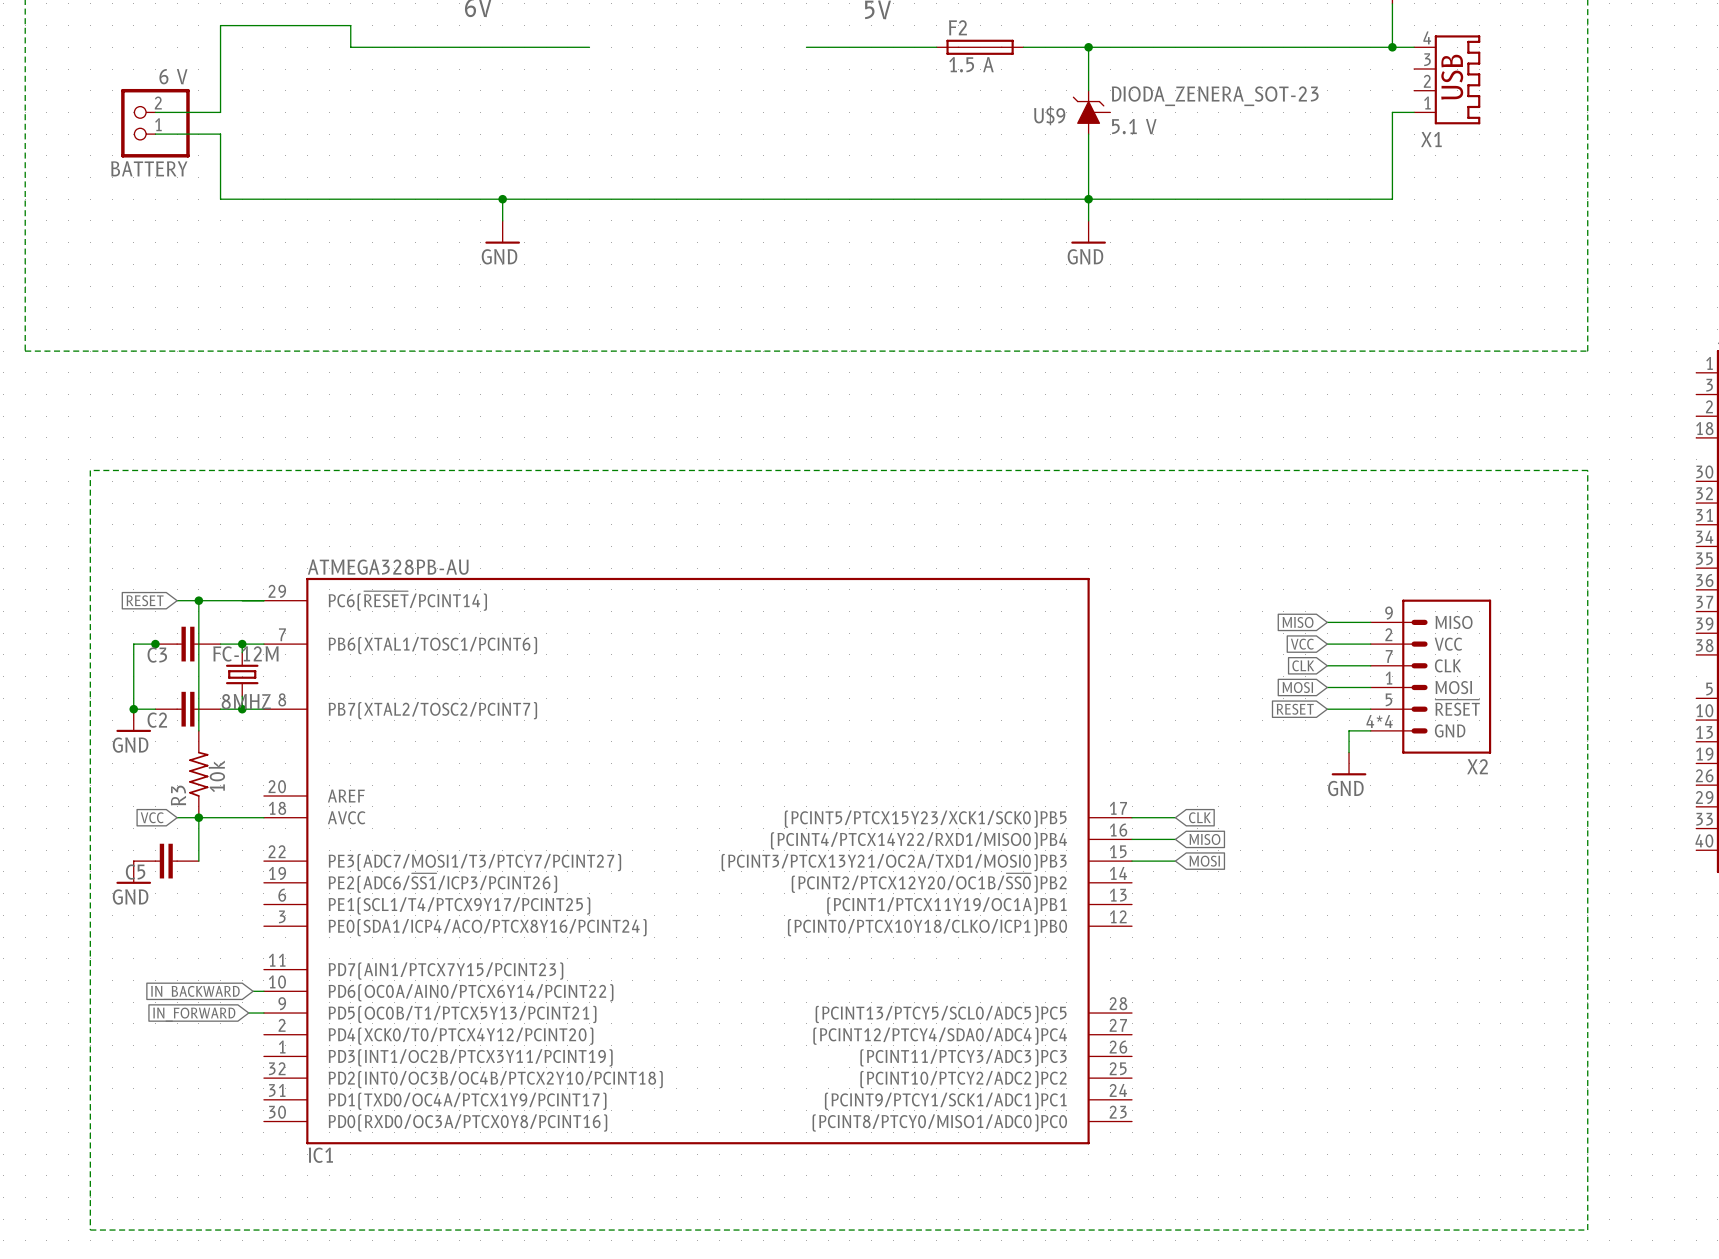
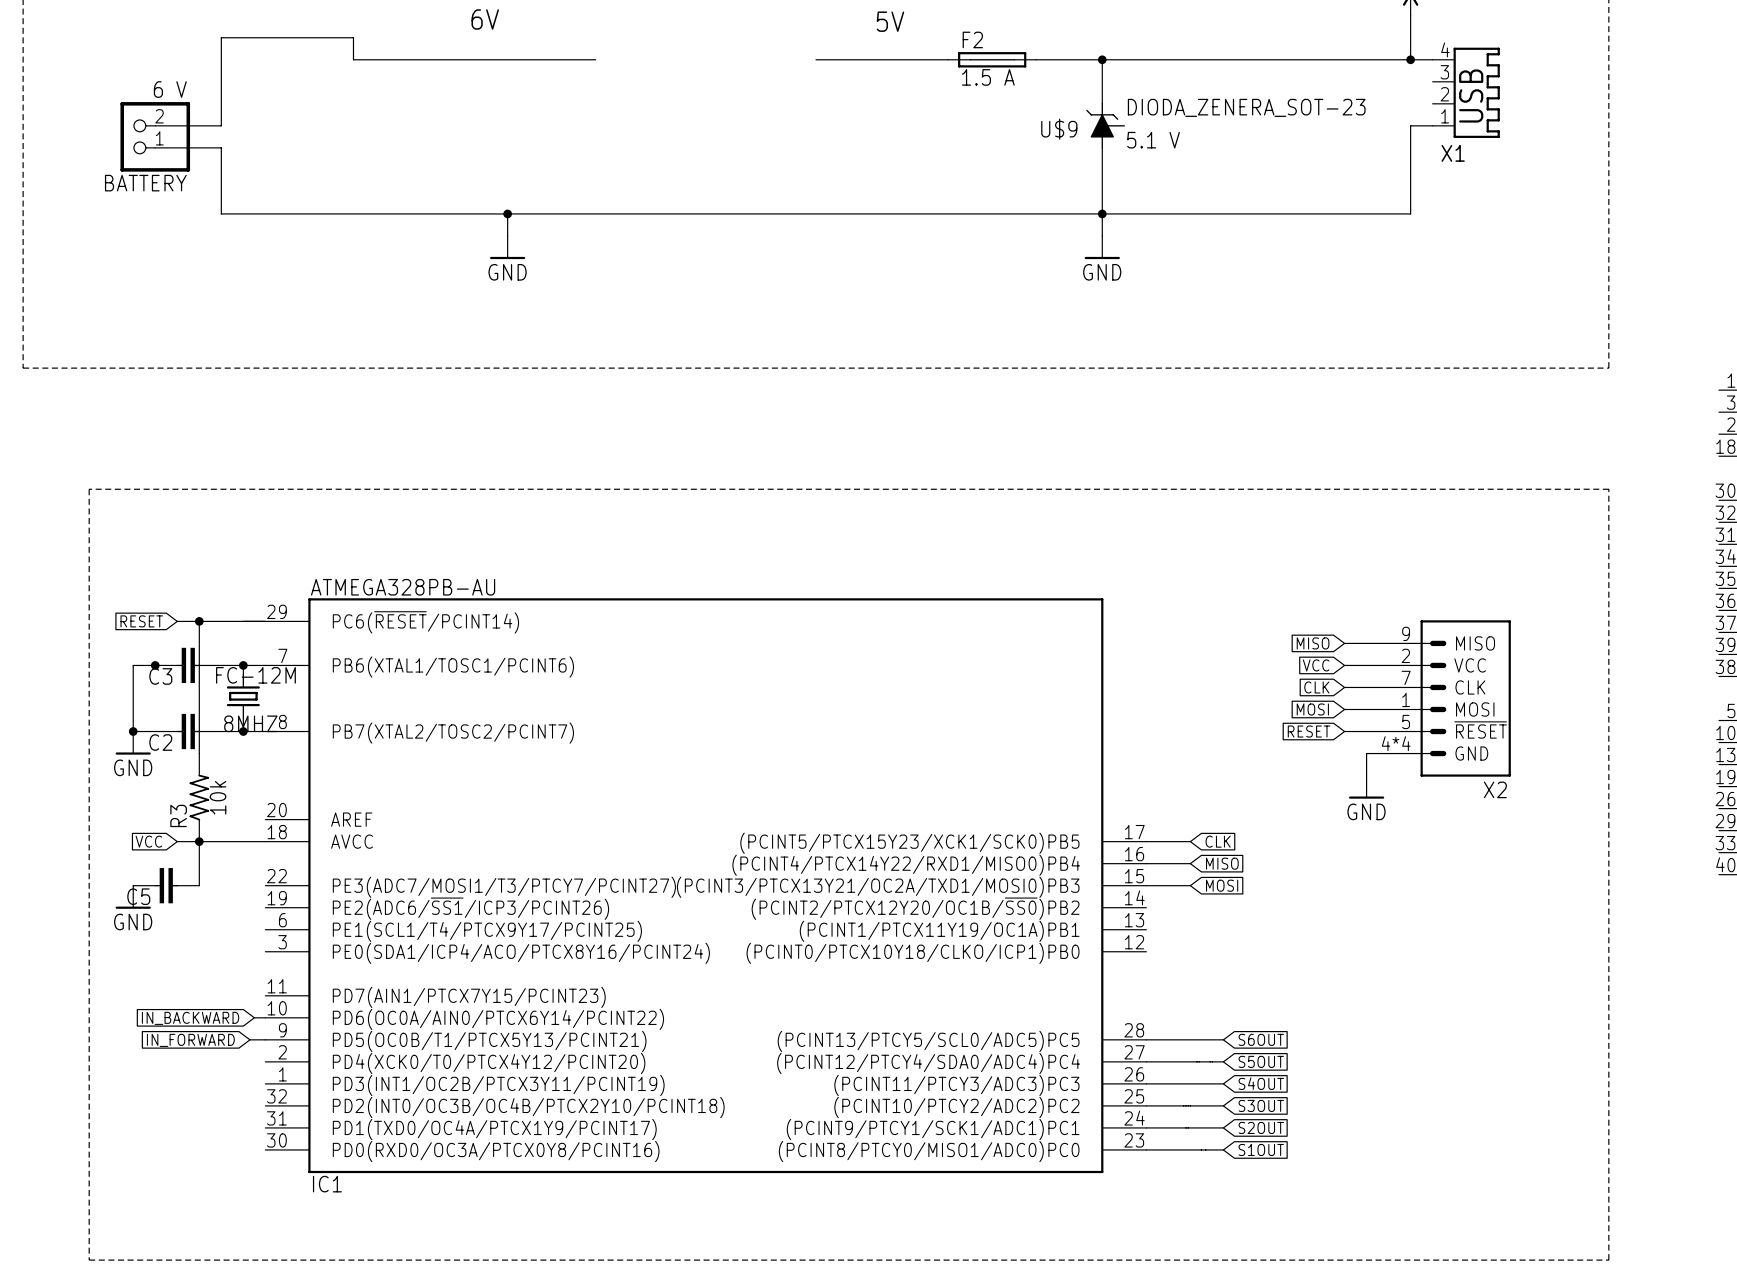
wire: none -> (1146, 1039) (1223, 1039)
global label: none -> S6OUT (1261, 1039)
wire: none -> (1146, 1061) (1223, 1061)
global label: none -> S5OUT (1261, 1061)
wire: none -> (1146, 1083) (1223, 1083)
global label: none -> S4OUT (1261, 1083)
wire: none -> (1146, 1105) (1223, 1105)
global label: none -> S3OUT (1261, 1105)
wire: none -> (1146, 1127) (1223, 1127)
global label: none -> S2OUT (1261, 1127)
wire: none -> (1146, 1149) (1223, 1149)
global label: none -> S1OUT (1261, 1149)

